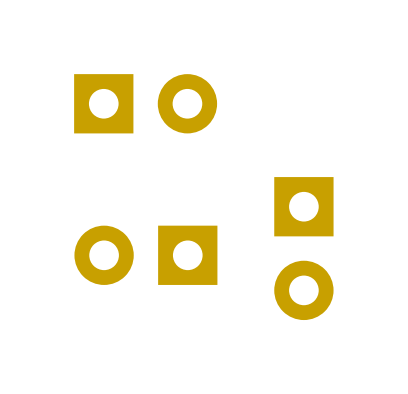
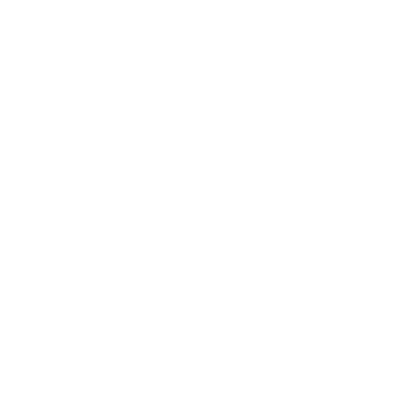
part: (145, 103) -> none
part: (303, 248) -> none
part: (145, 255) -> none

